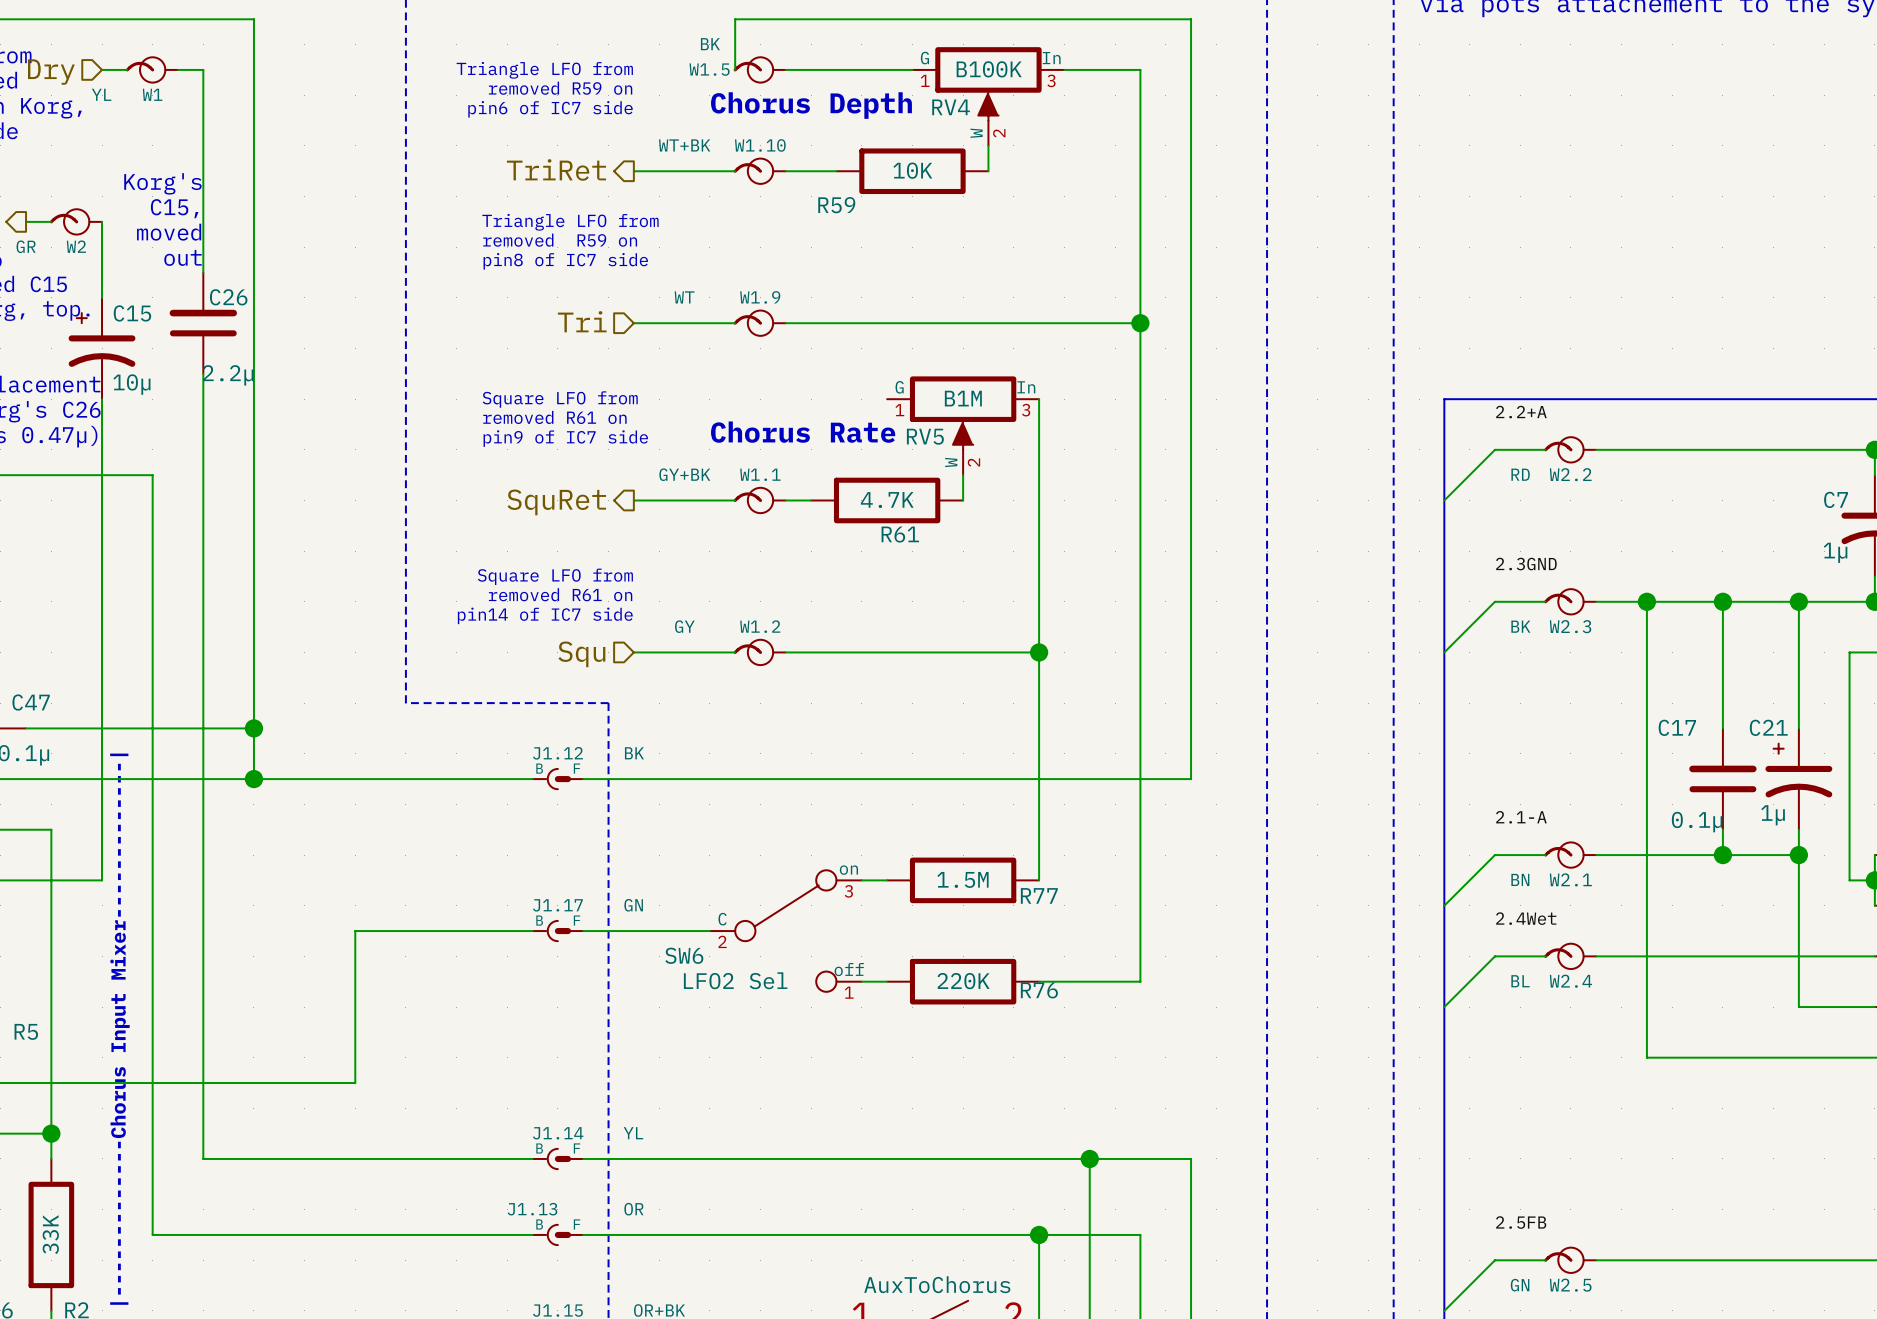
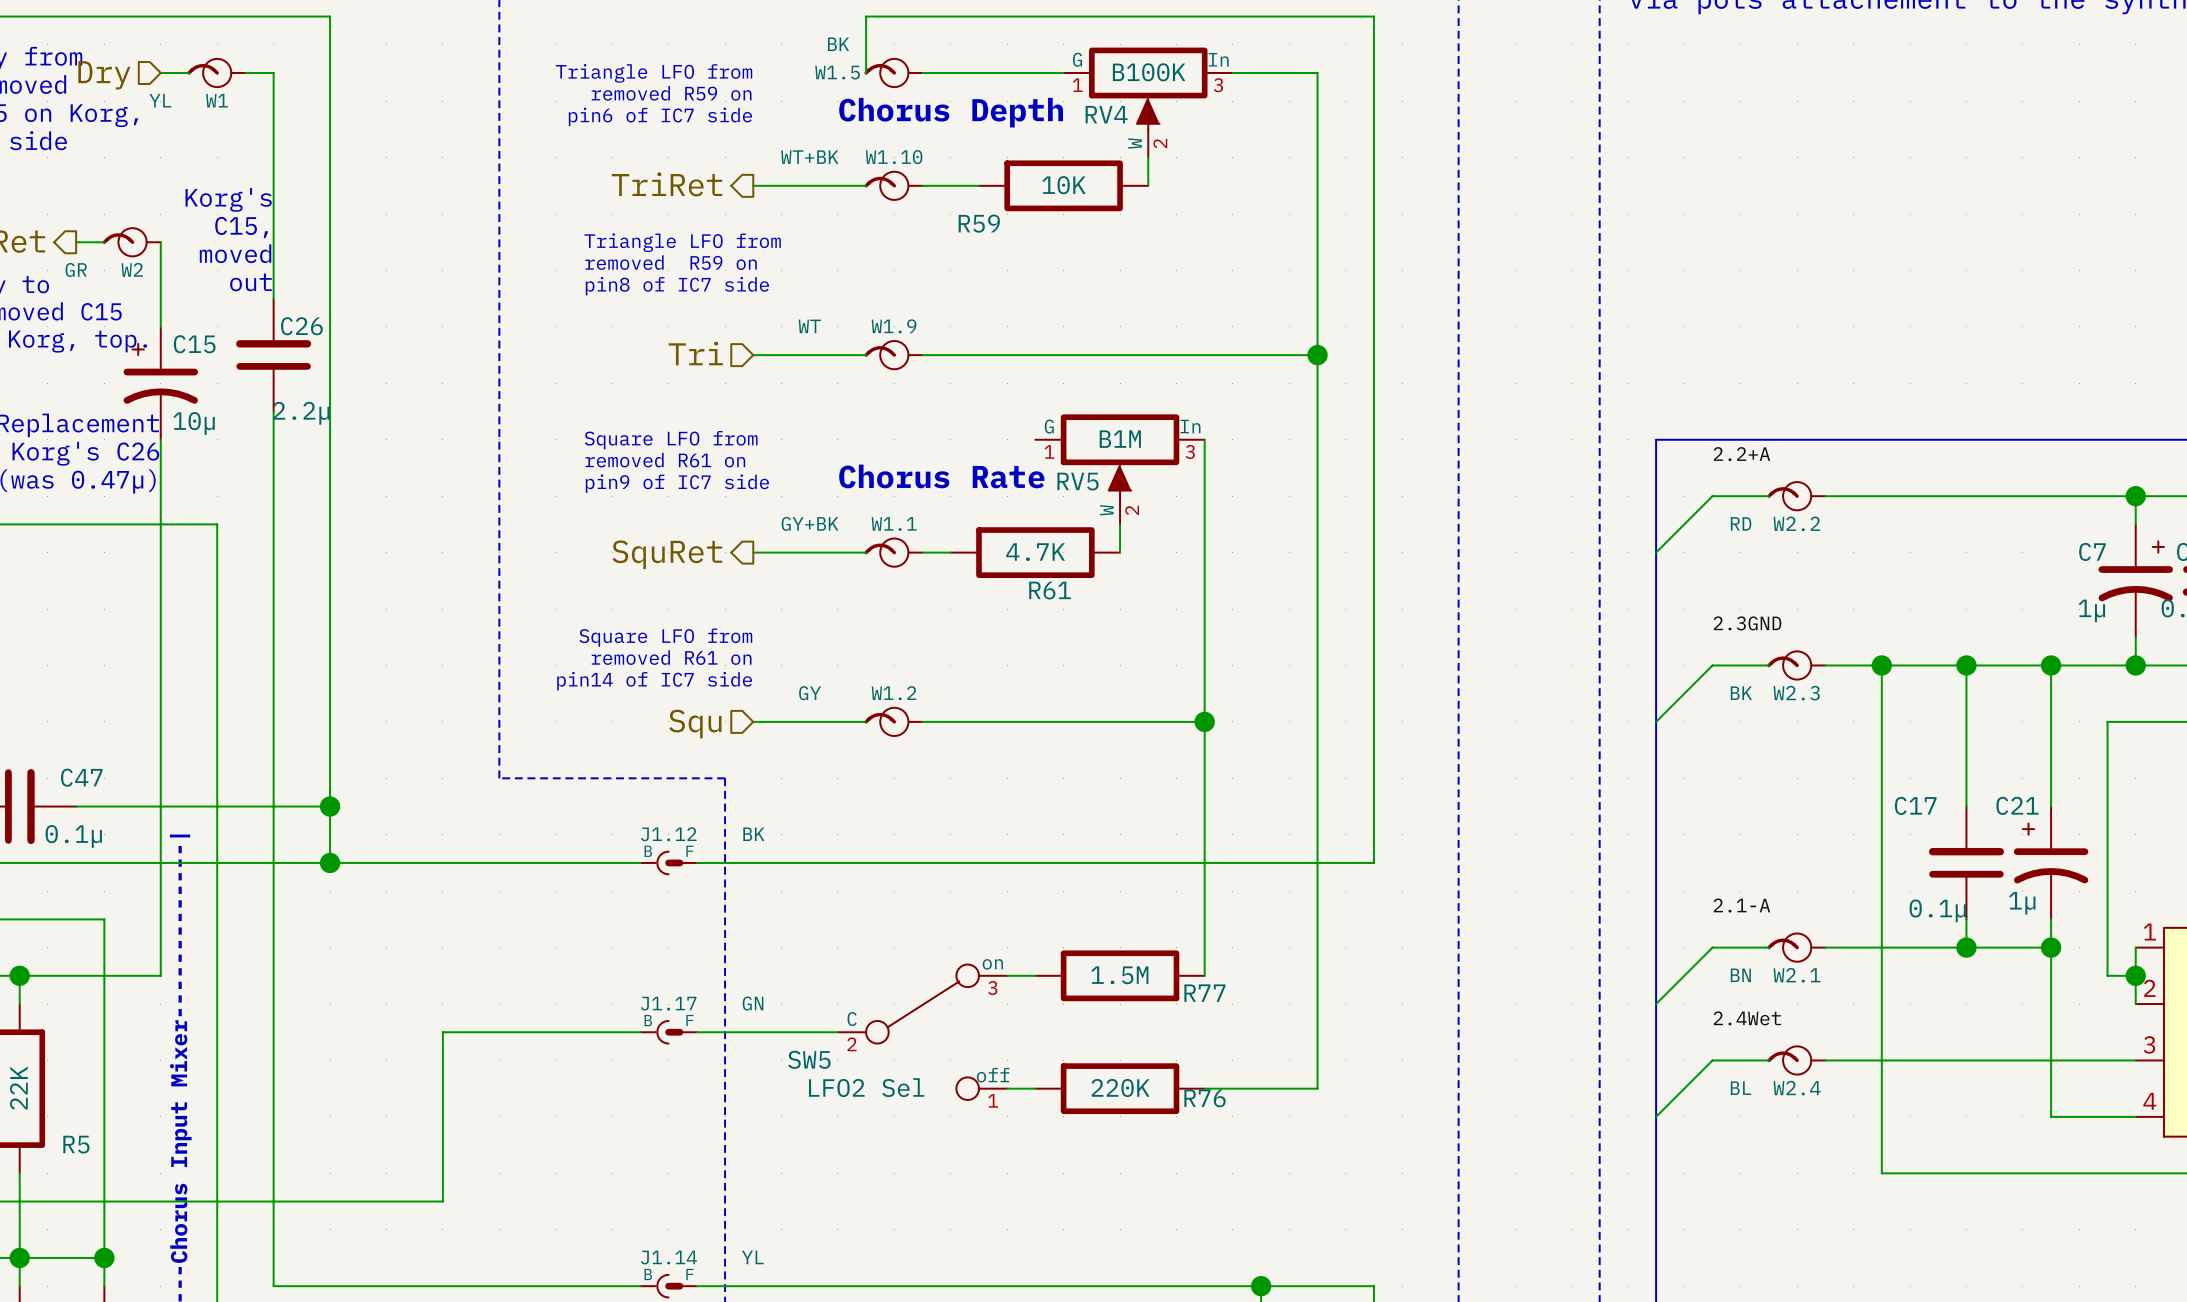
SW6 name: SW6 (684, 955) -> SW5 (809, 1059)

